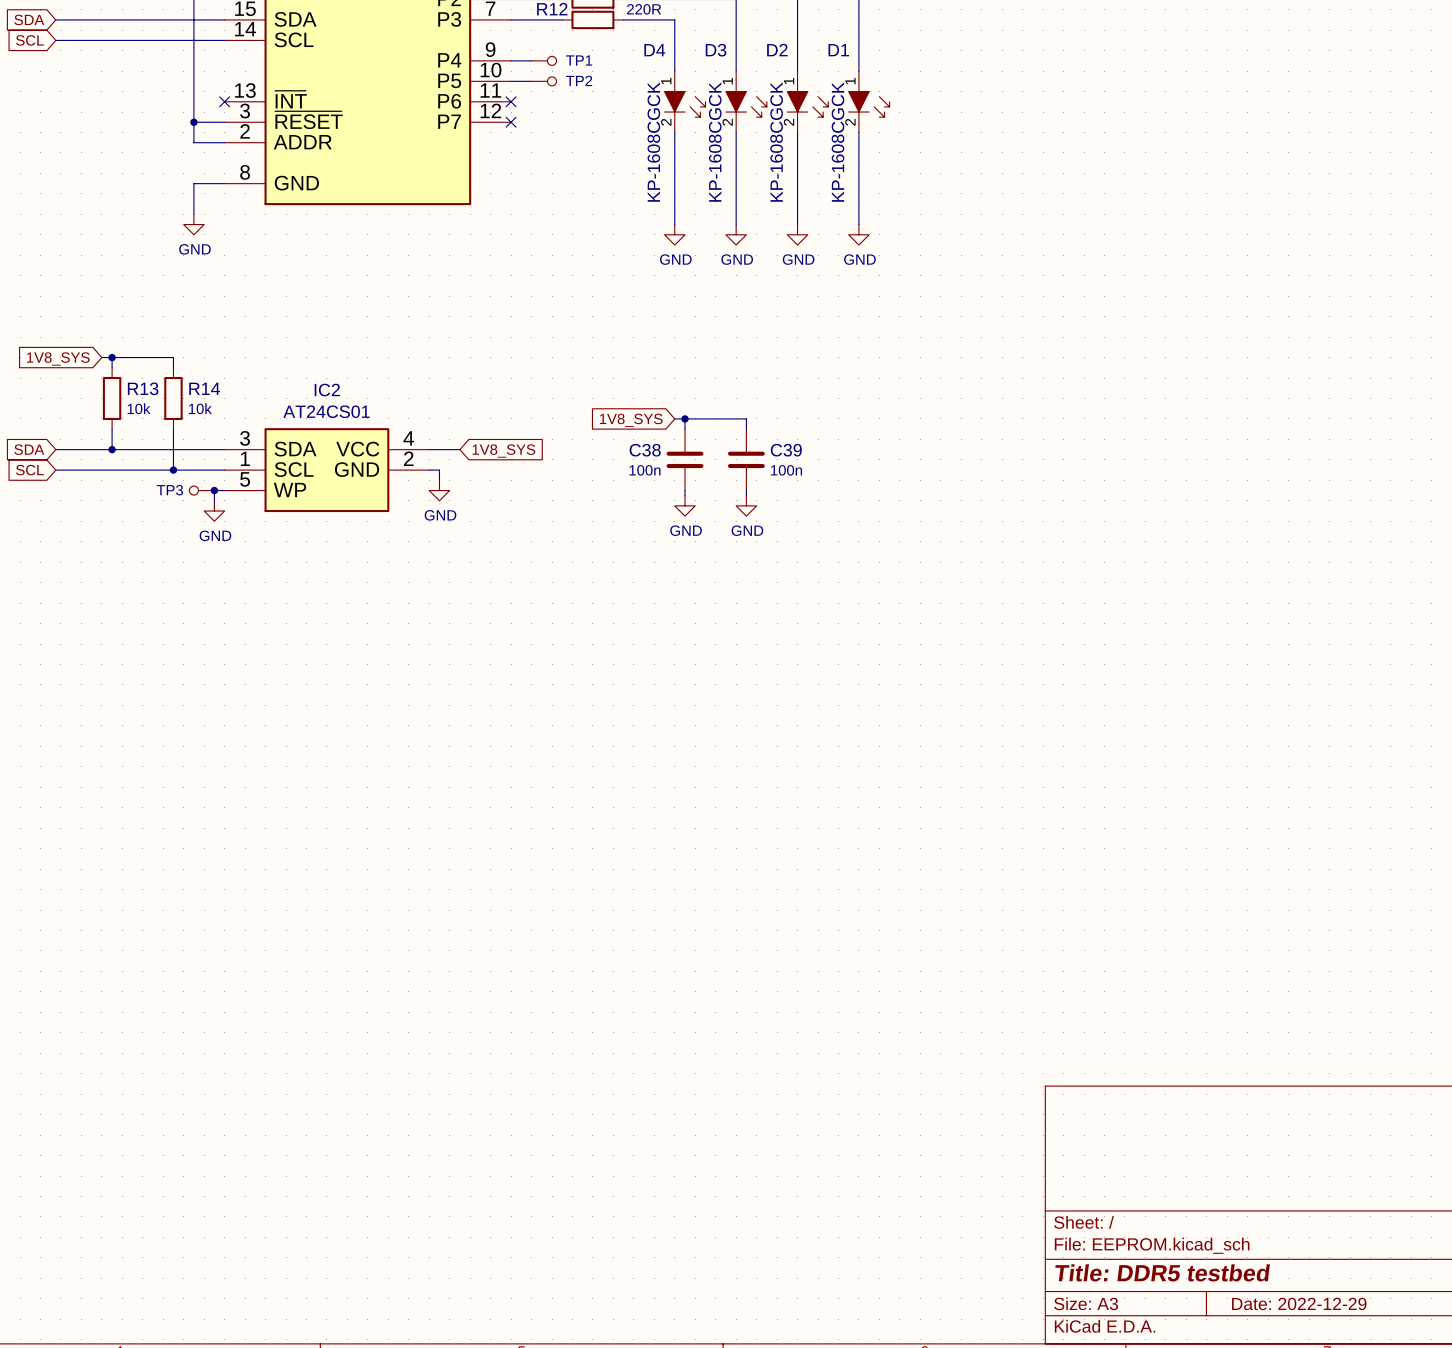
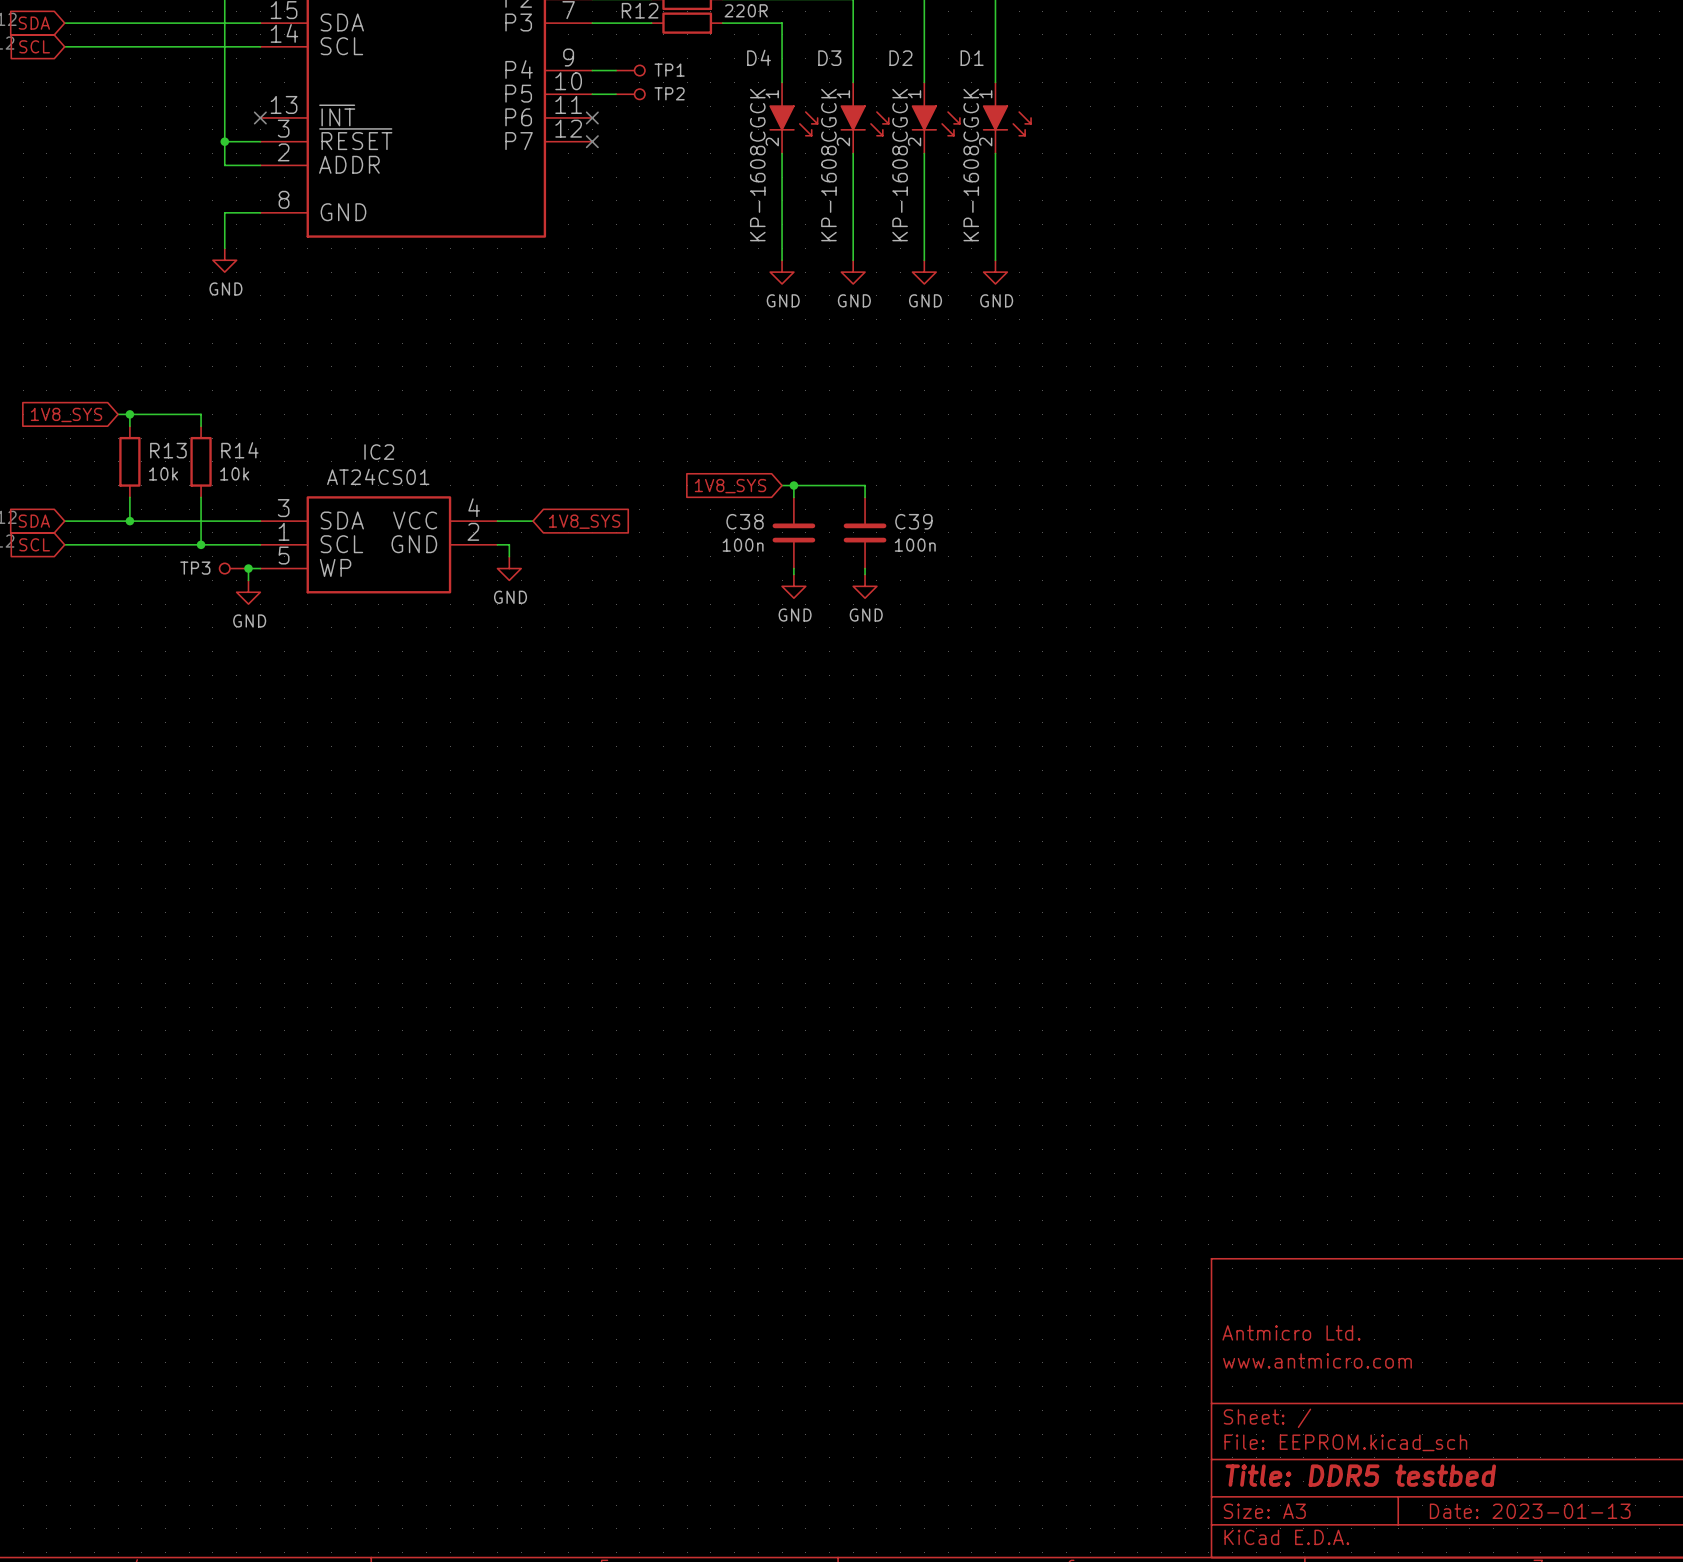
title block: none -> Antmicro Ltd. (1291, 1332)
title block: none -> www.antmicro.com (1317, 1360)
title block: Date: 2022-12-29 (1299, 1303) -> Date: 2023-01-13 (1530, 1511)

